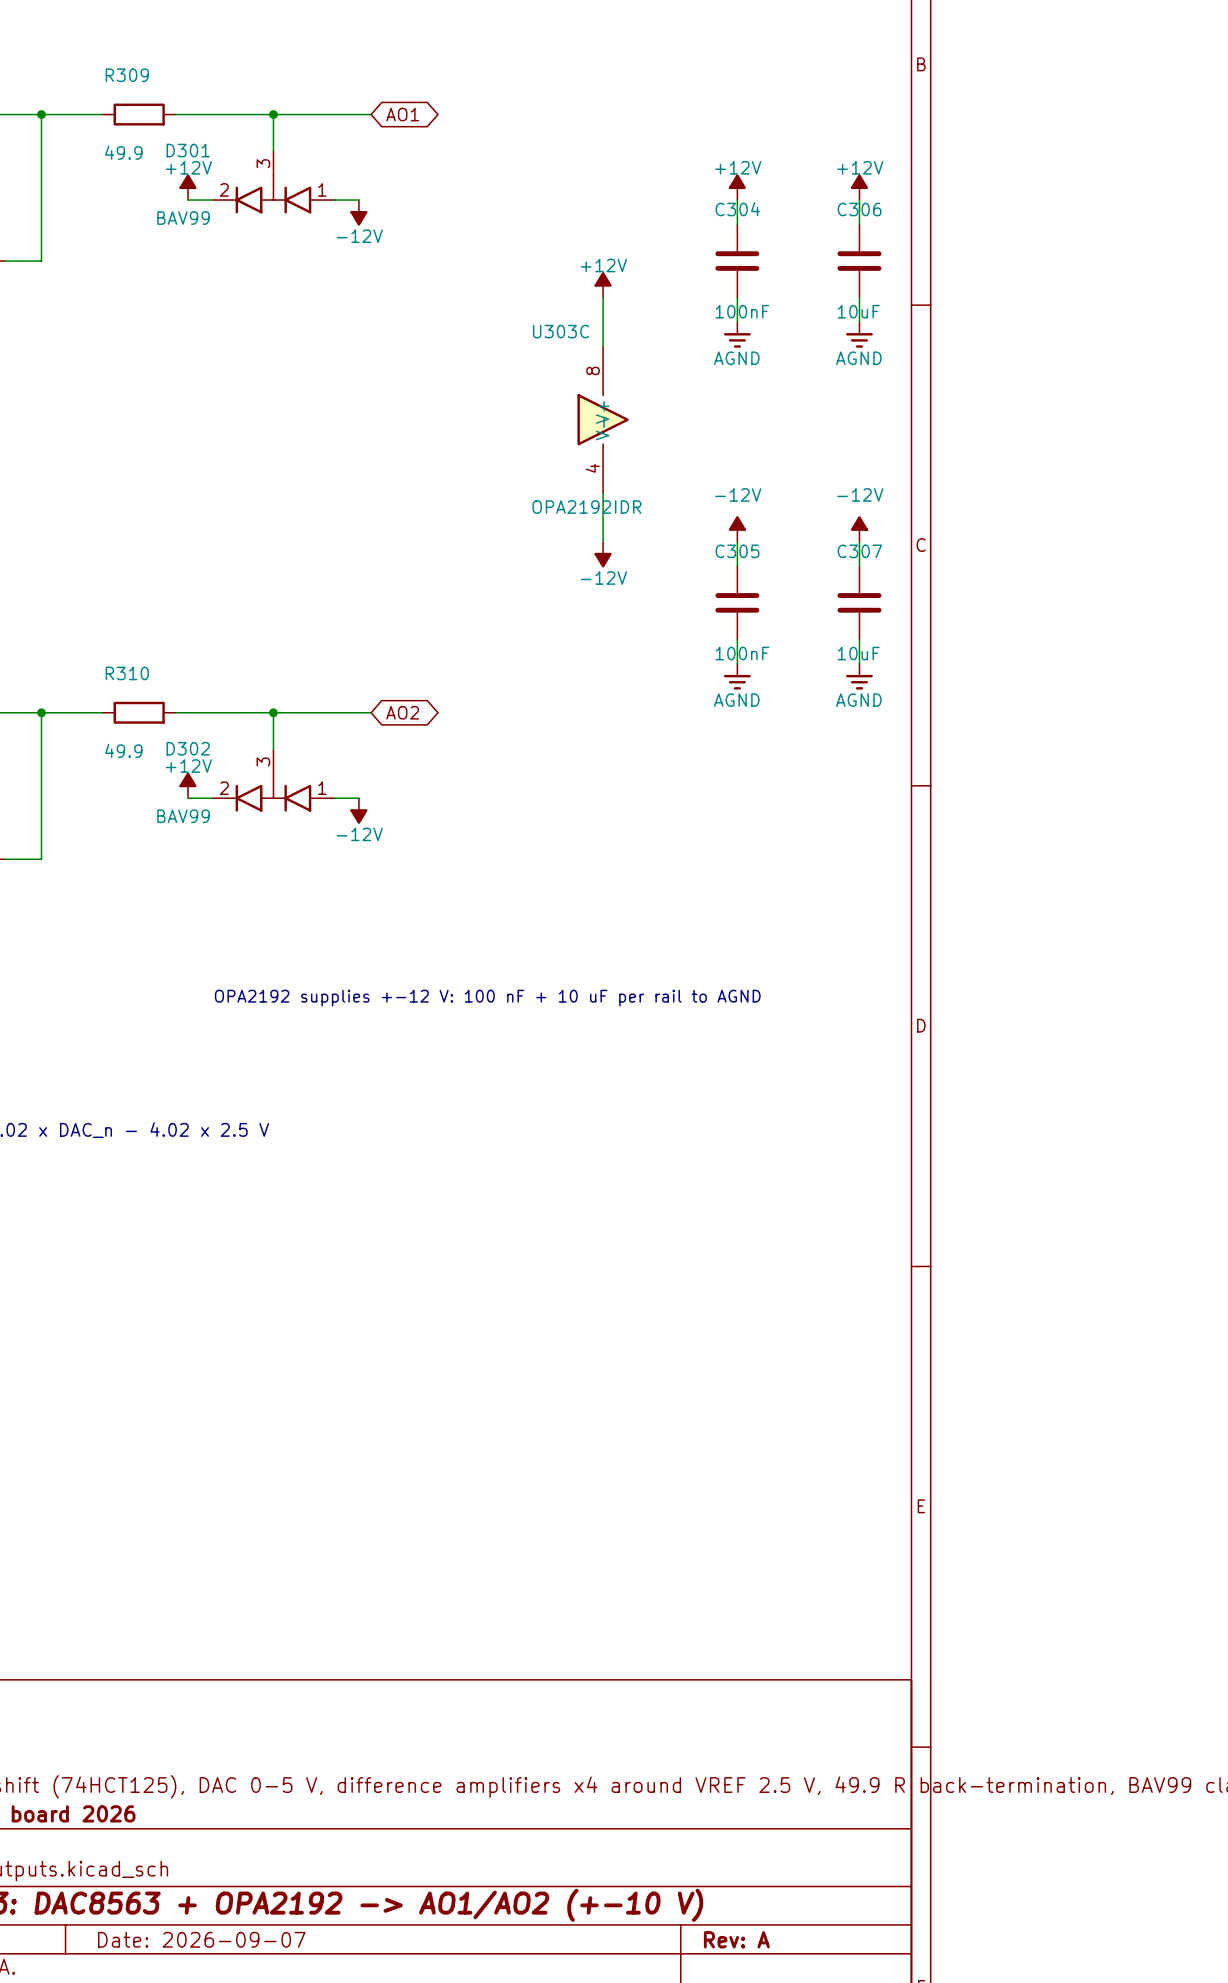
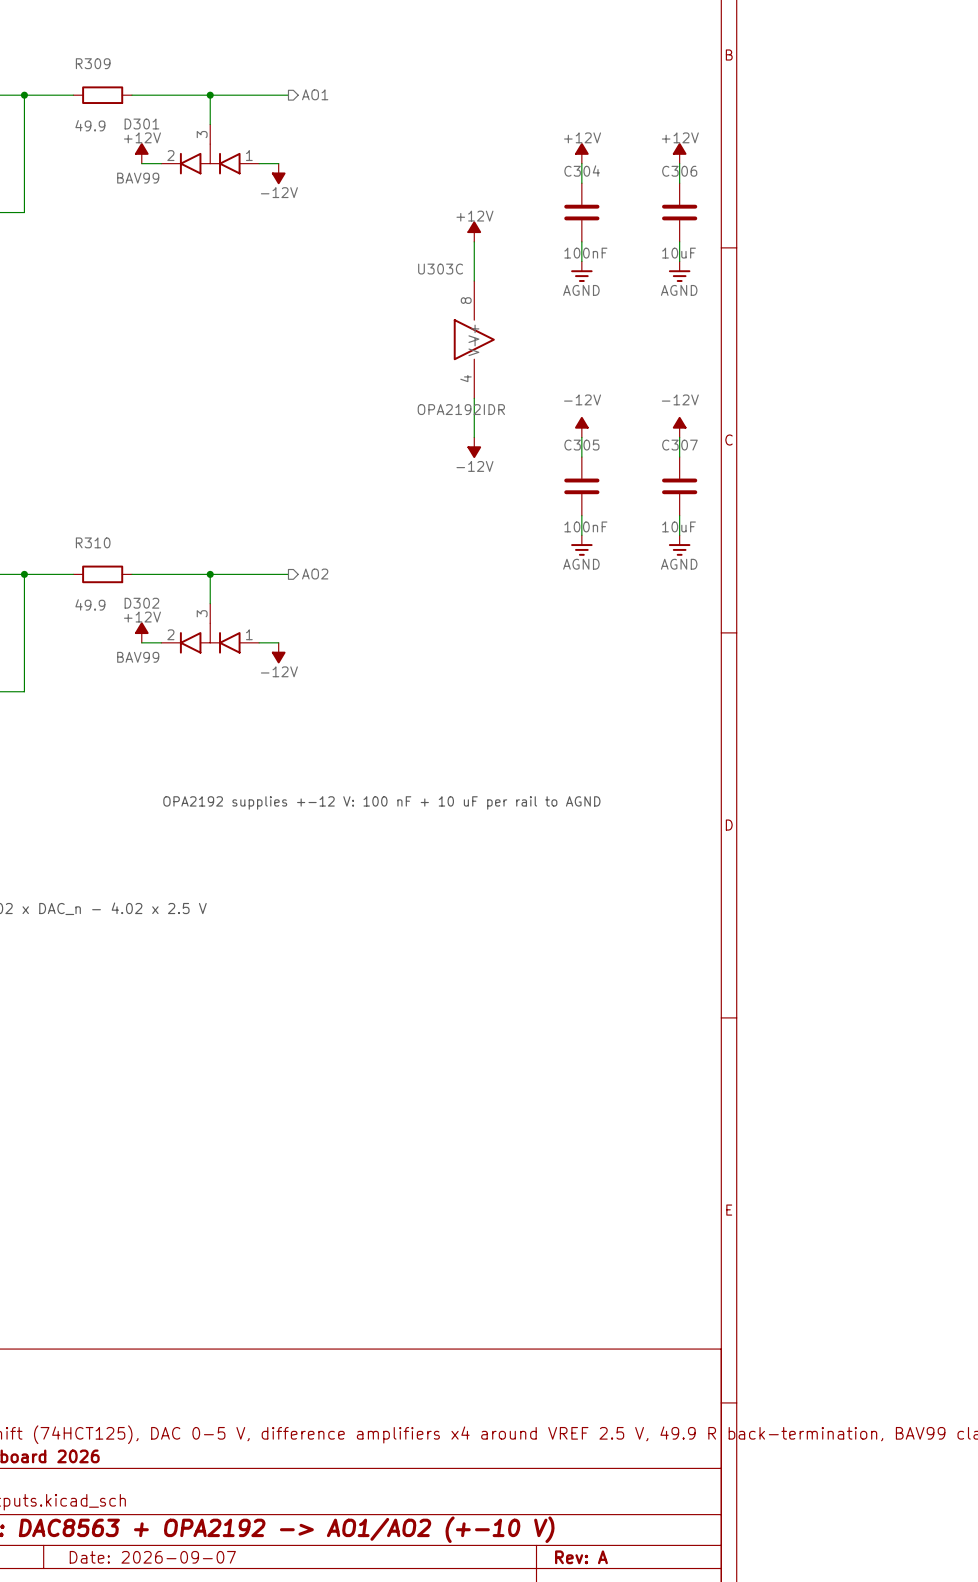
global label: AO1 (402, 114) -> none
hierarchical label: none -> AO1 (315, 94)
global label: AO2 (402, 712) -> none
hierarchical label: none -> AO2 (315, 574)

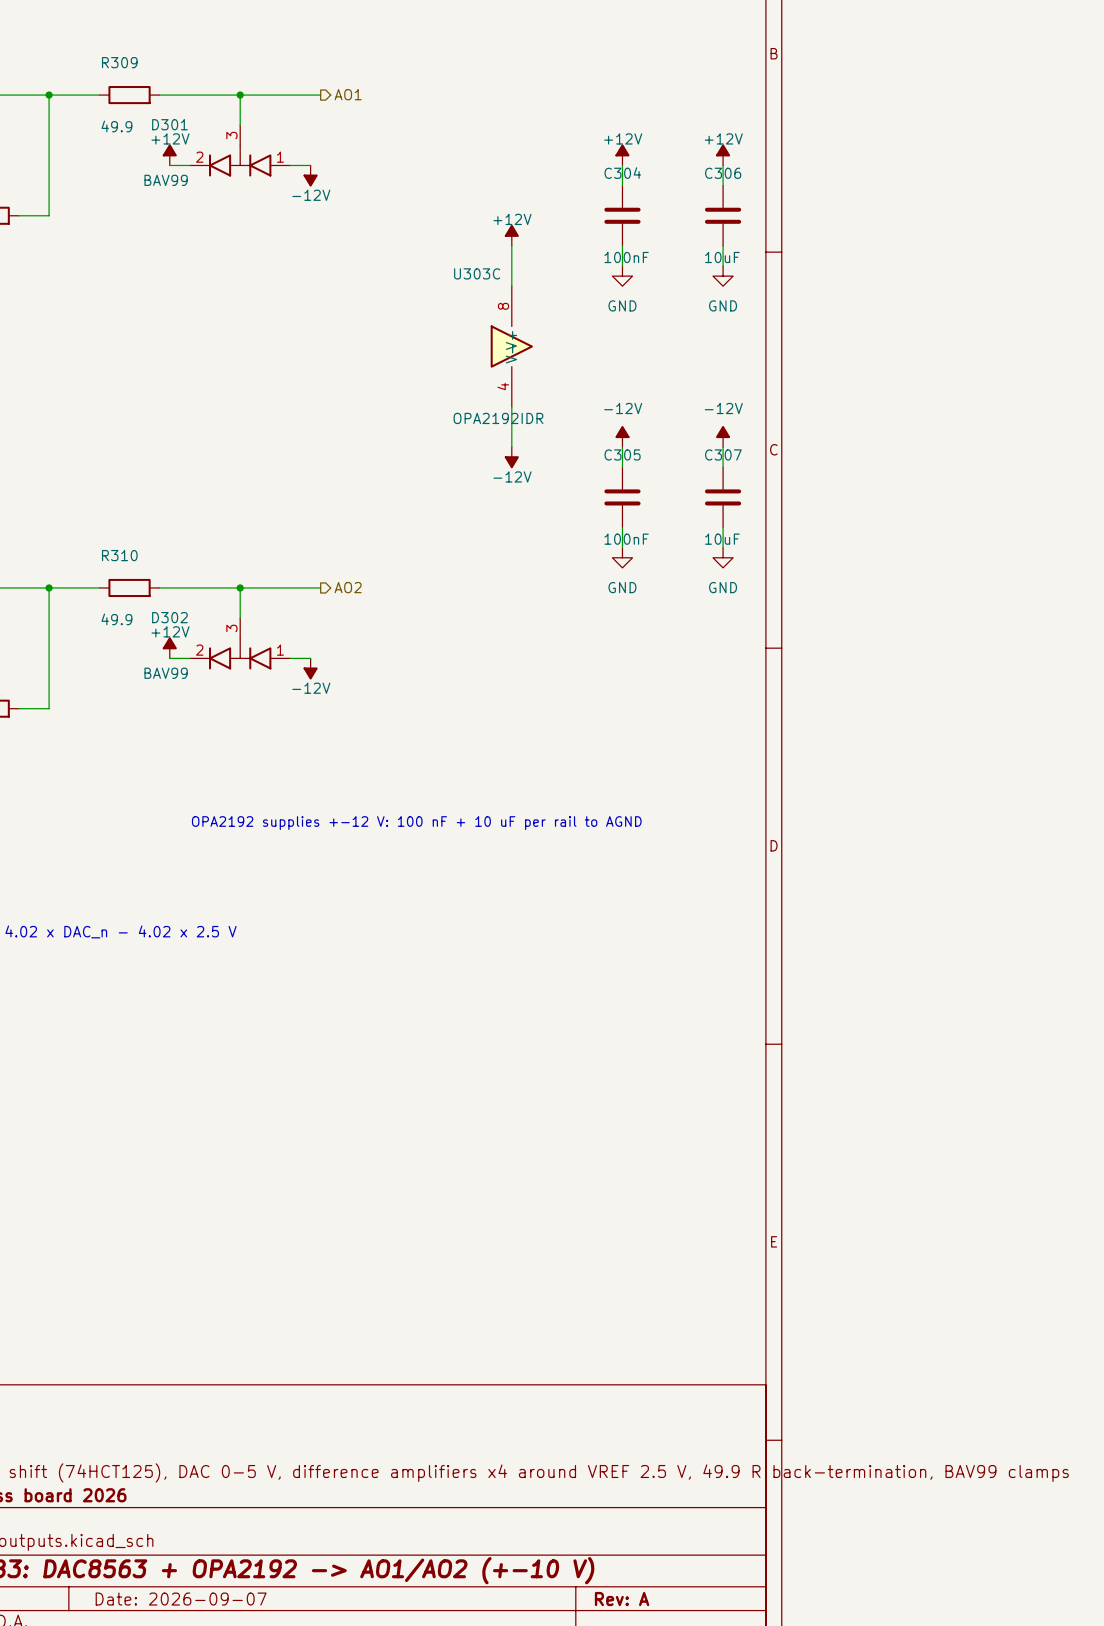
power symbol: AGND (581, 271) -> GND (622, 276)
power symbol: AGND (679, 271) -> GND (723, 276)
power symbol: AGND (581, 545) -> GND (622, 557)
power symbol: AGND (679, 545) -> GND (723, 557)

